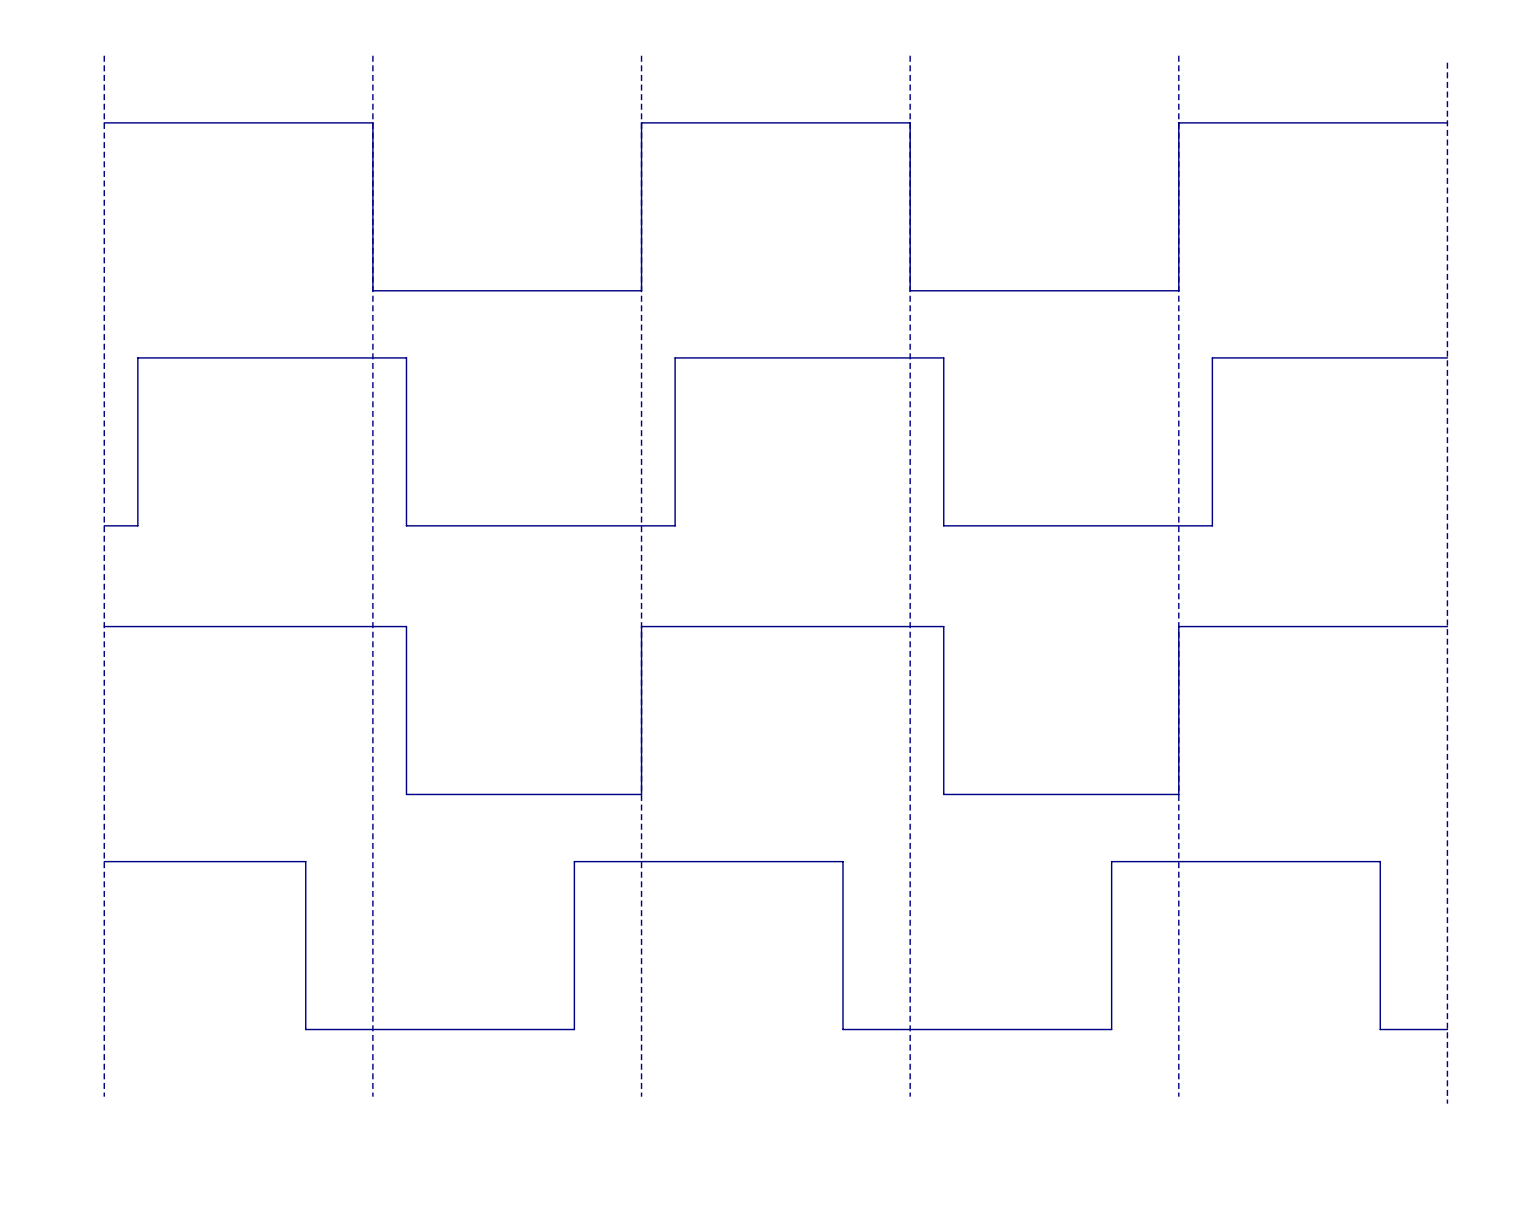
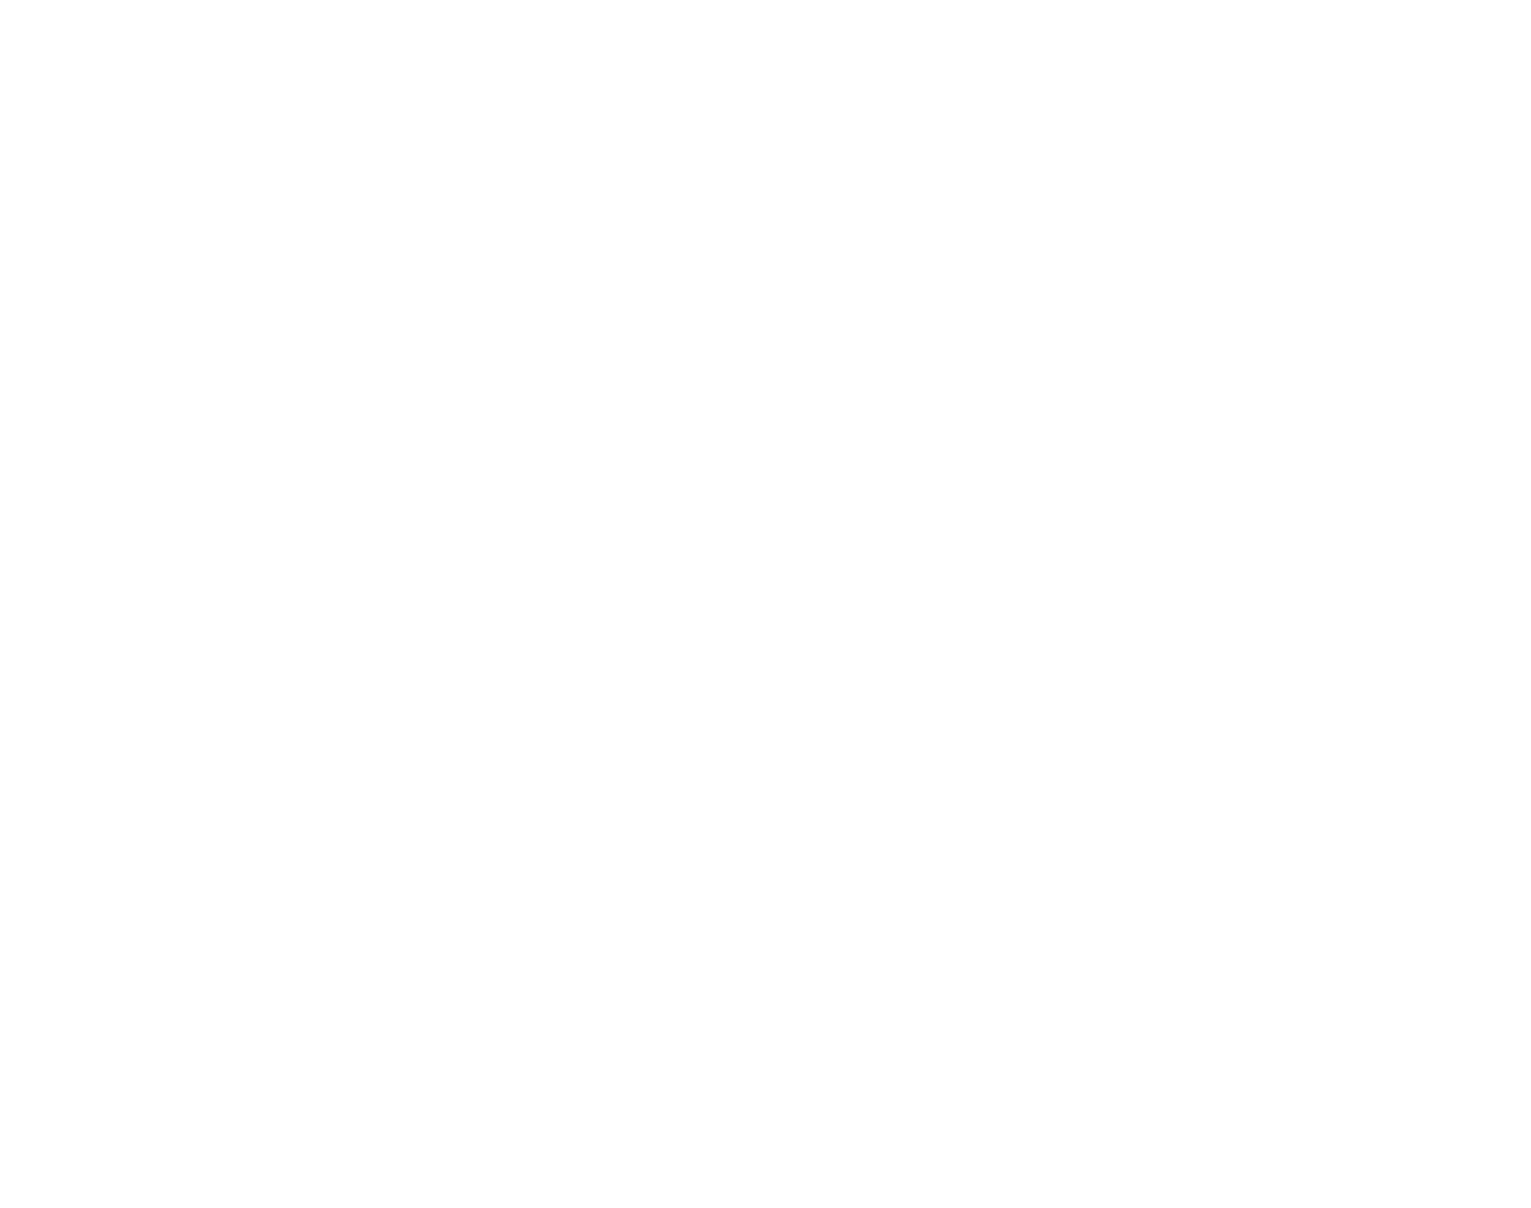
line: (104, 55) (104, 1096) -> none
line: (372, 55) (372, 1096) -> none
line: (641, 55) (641, 1096) -> none
line: (910, 55) (910, 1096) -> none
line: (1178, 55) (1178, 1096) -> none
line: (1447, 62) (1447, 1103) -> none
line: (104, 122) (372, 122) (372, 290) (641, 290) (641, 122) (910, 122) (910, 290) (1178, 290) (1178, 122) (1447, 122) -> none
line: (1447, 357) (1212, 357) (1212, 525) (943, 525) (943, 357) (675, 357) (675, 525) (406, 525) (406, 357) (137, 357) (137, 525) (104, 525) -> none
line: (104, 626) (406, 626) (406, 794) (641, 794) (641, 626) (943, 626) (943, 794) (1178, 794) (1178, 626) (1447, 626) -> none
line: (104, 861) (305, 861) (305, 1029) (574, 1029) (574, 861) (843, 861) (843, 1029) (1111, 1029) (1111, 861) (1380, 861) (1380, 1029) (1447, 1029) -> none

